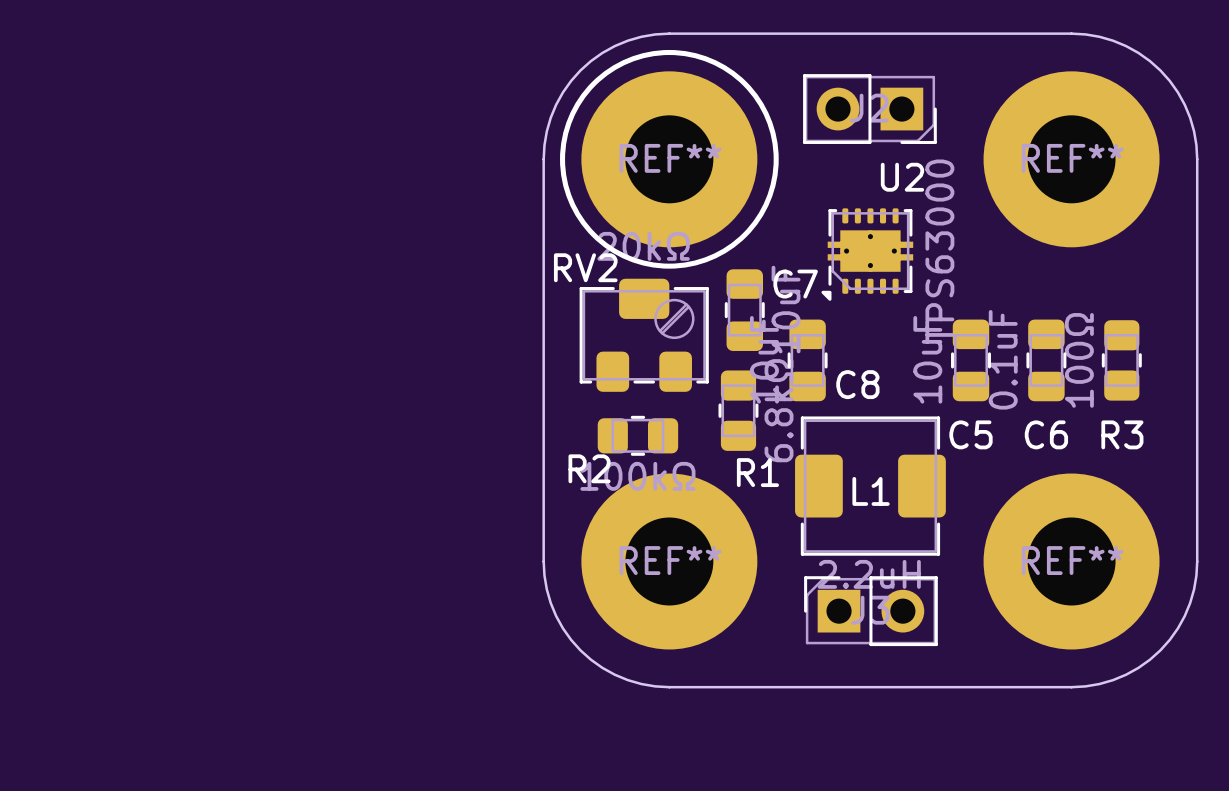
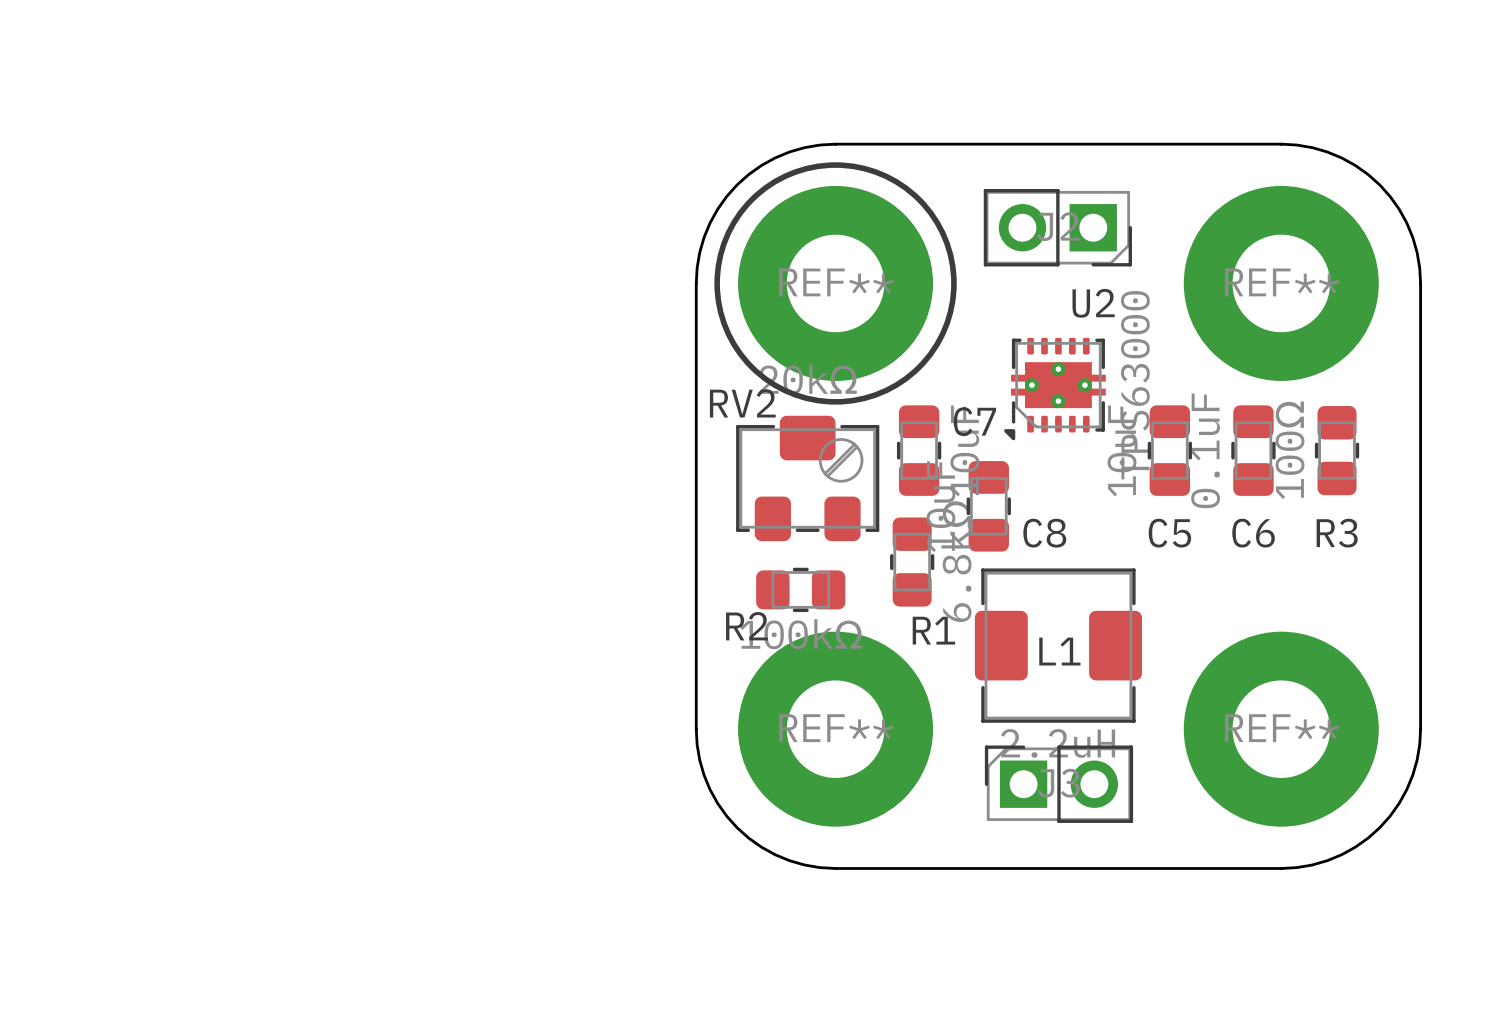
C5 position: (970, 360) -> (1169, 450)
C6 position: (1046, 360) -> (1253, 450)
R3 position: (1121, 360) -> (1337, 450)

